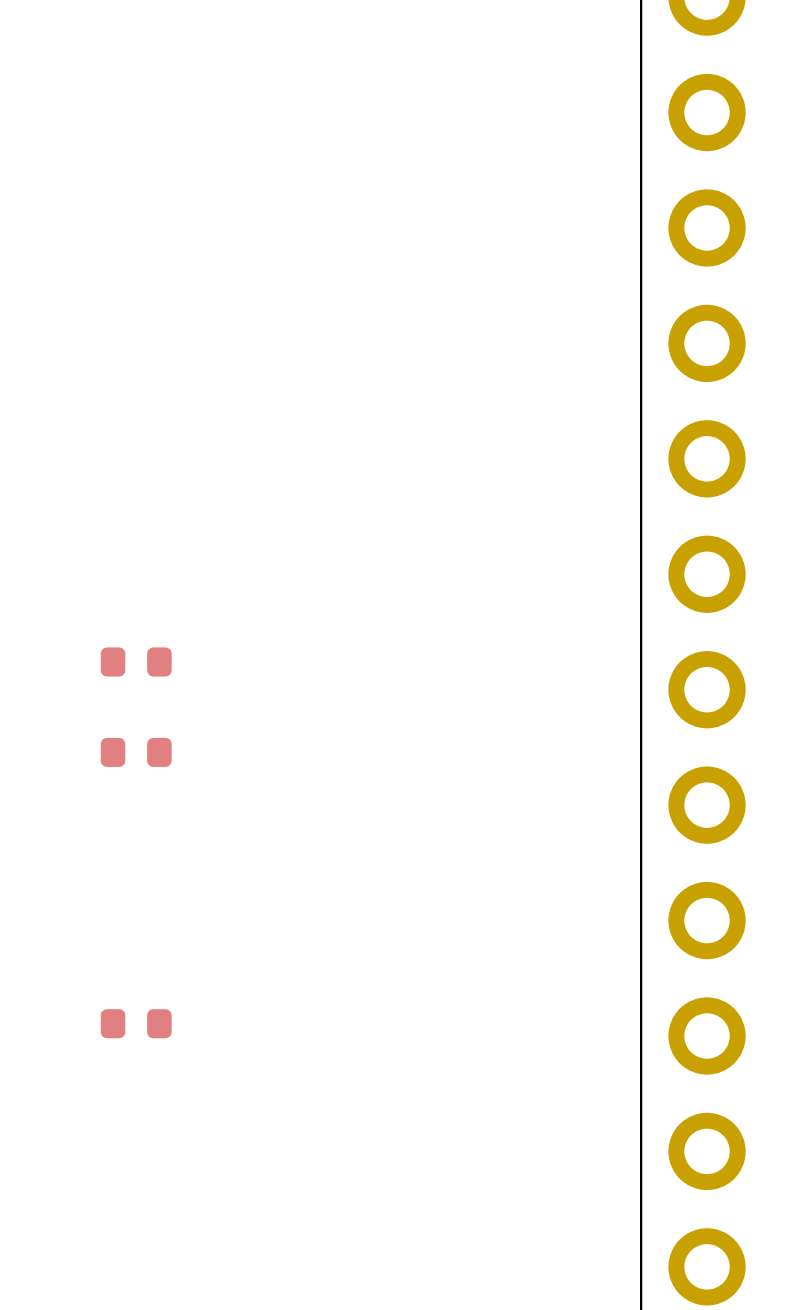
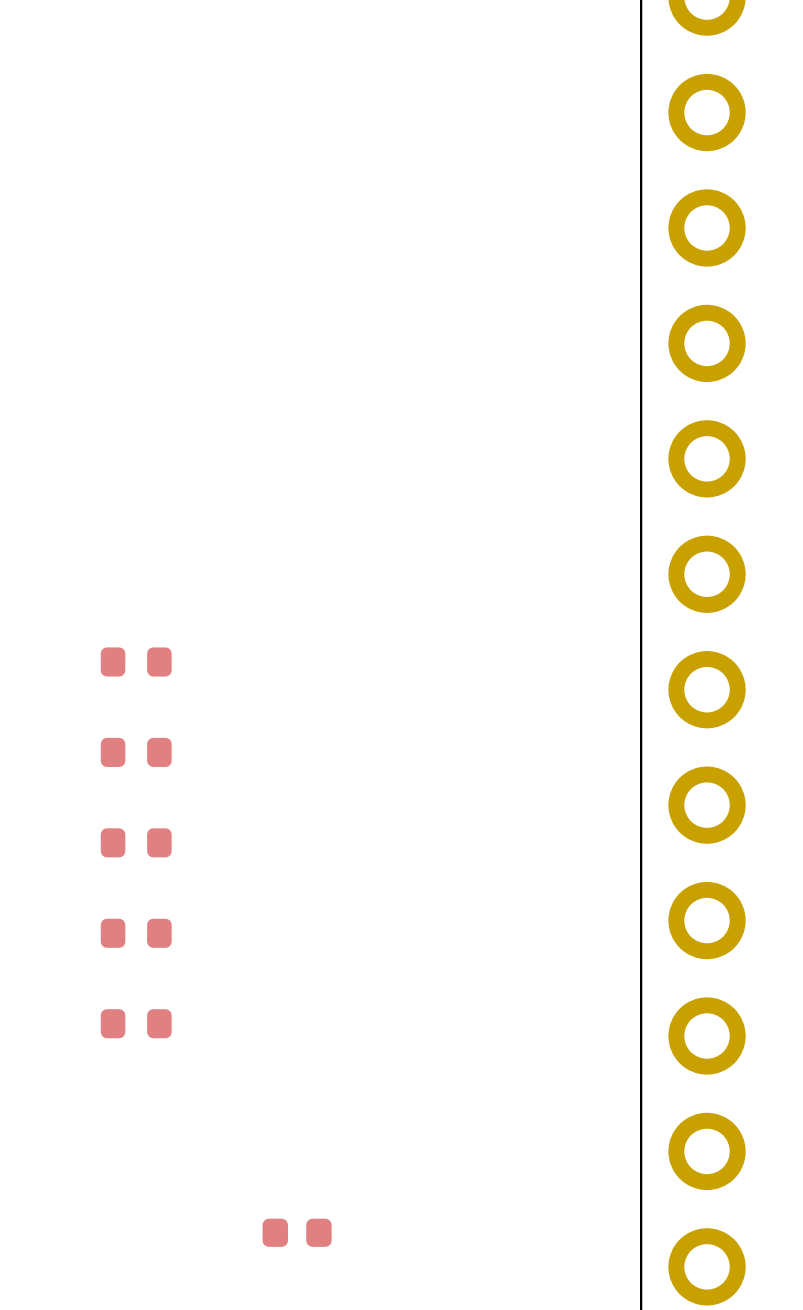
part: none -> (136, 842)
part: none -> (136, 933)
part: none -> (297, 1232)

